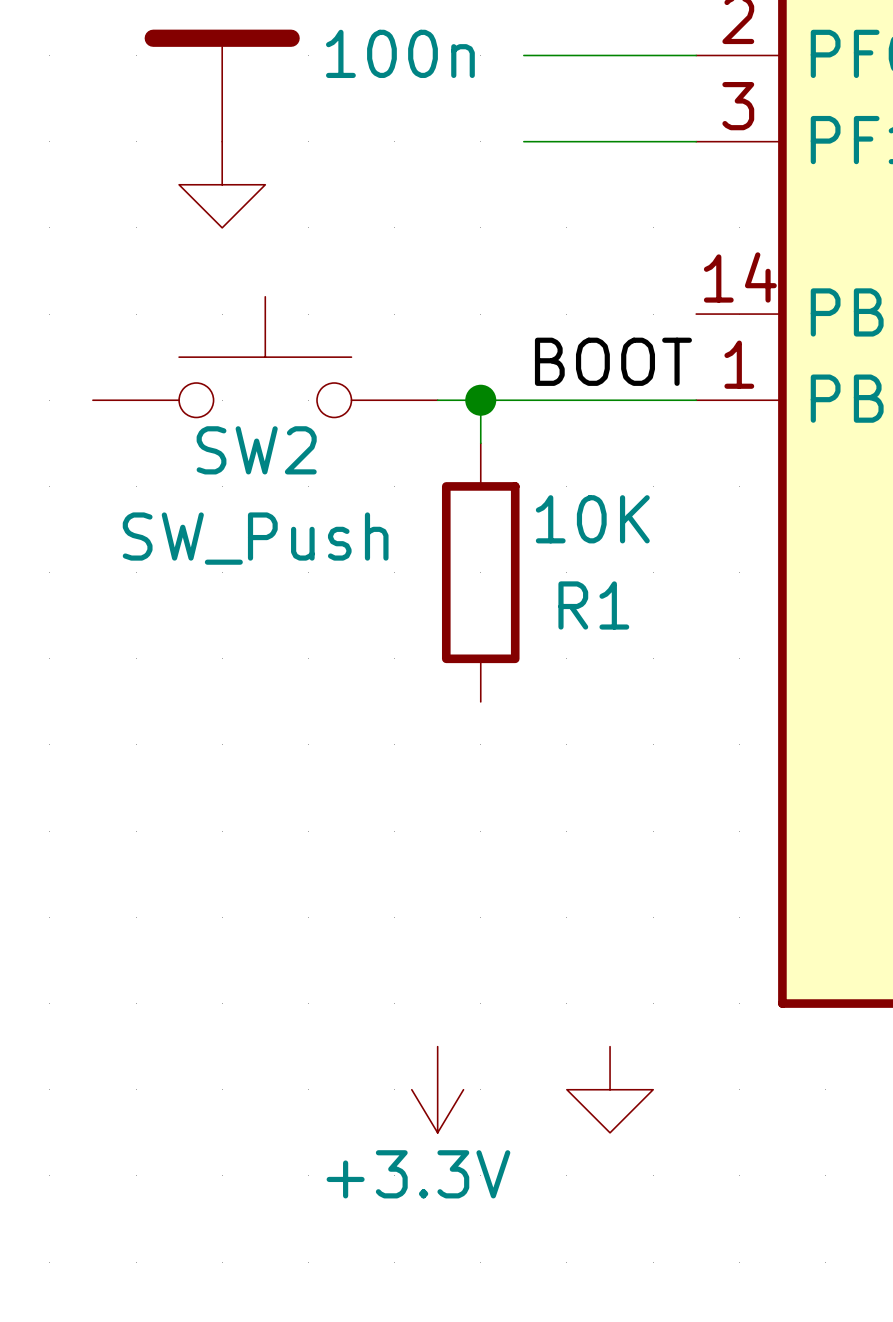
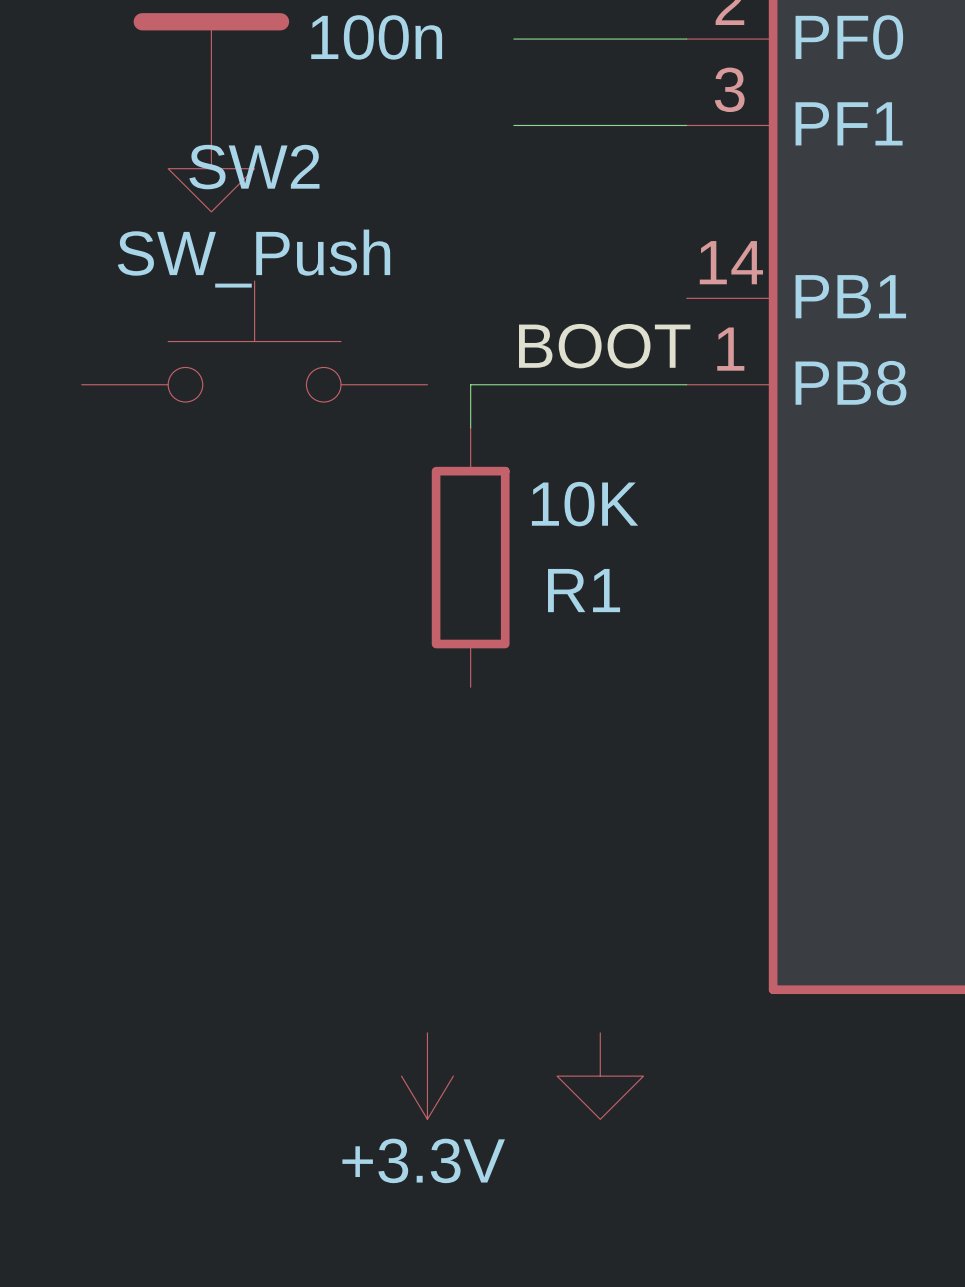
wire: (437, 400) (480, 400) -> none
junction: (480, 400) -> none
SW2 name position: SW2 (256, 450) -> SW2 (254, 167)
SW2 value position: SW_Push (255, 538) -> SW_Push (253, 258)

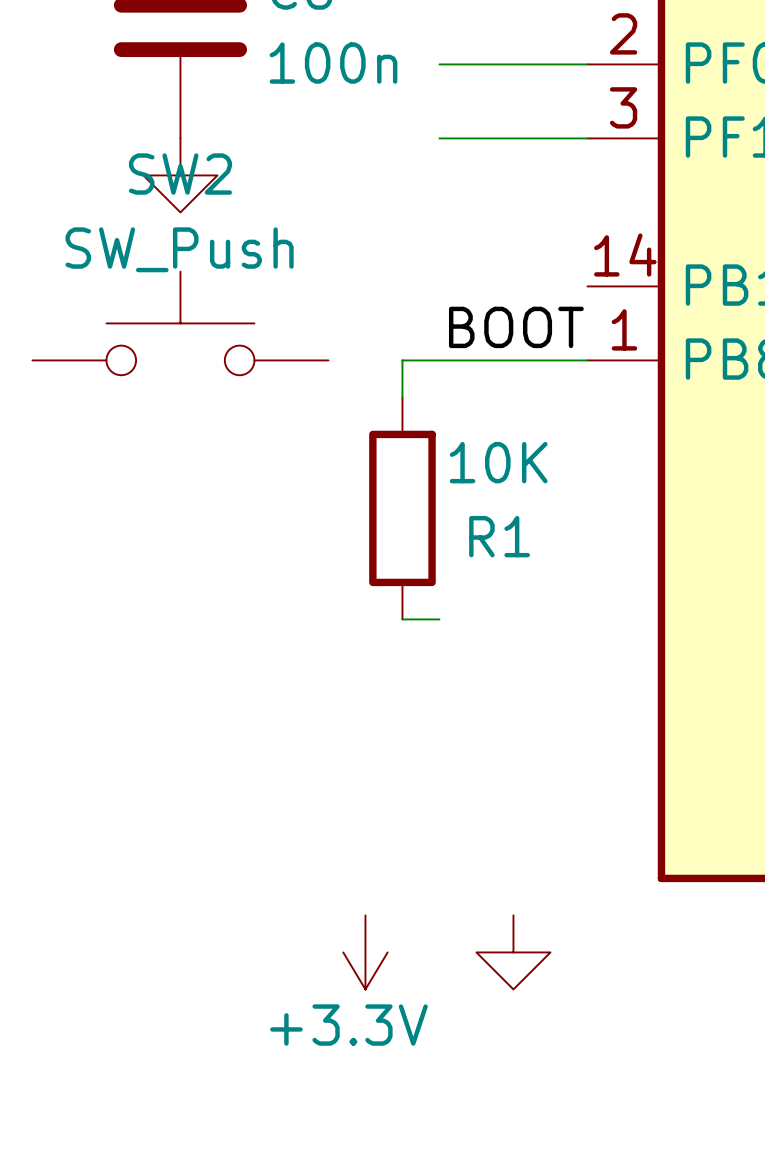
SW2 position: (254, 341) -> (180, 323)
wire: none -> (402, 619) (439, 619)

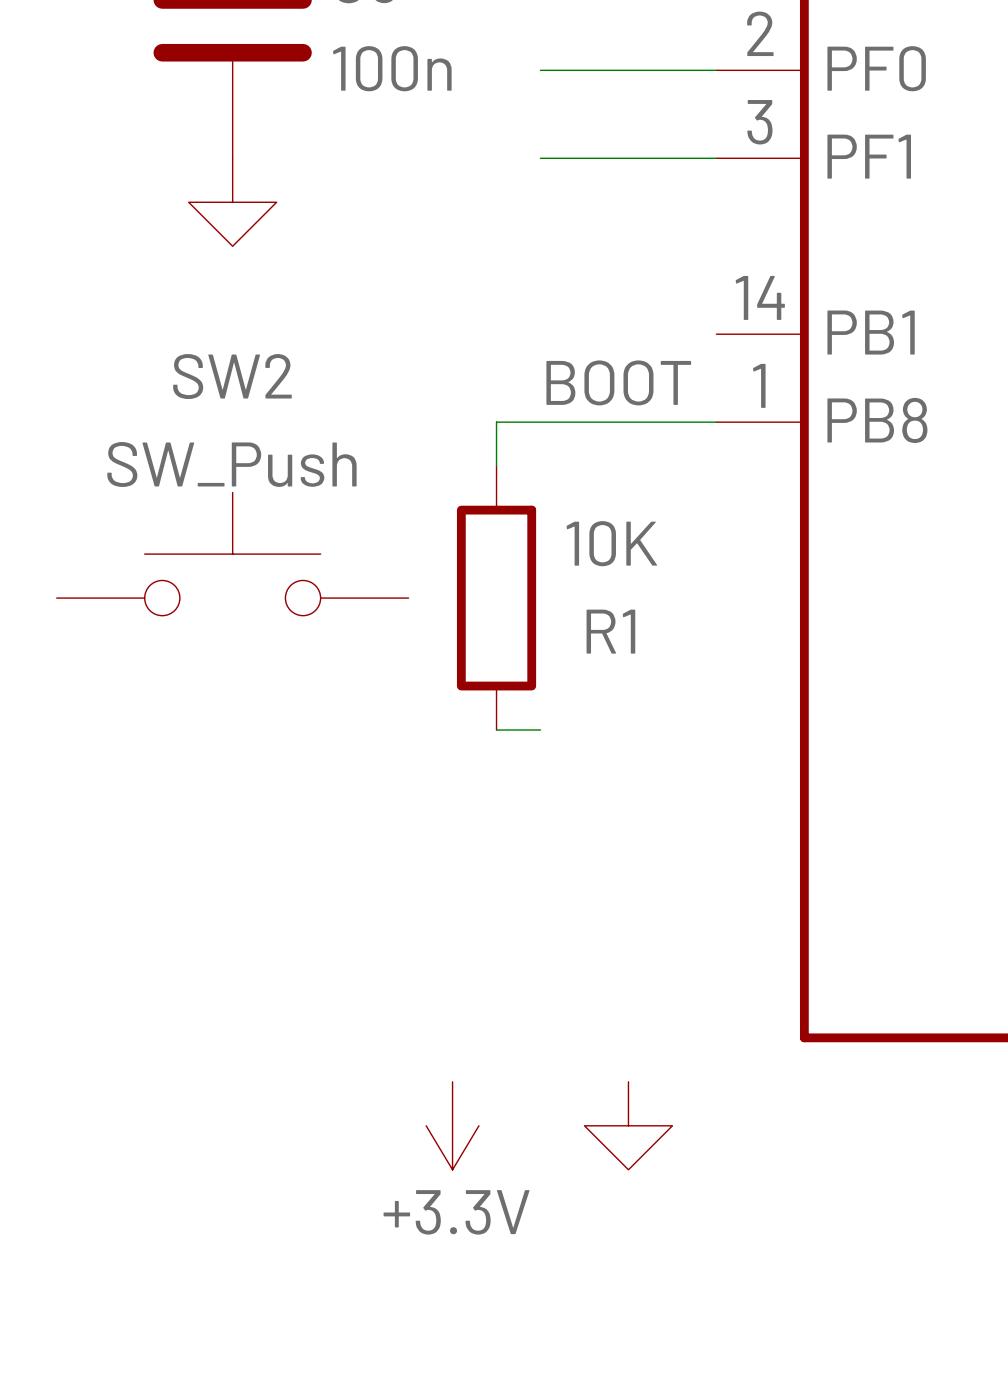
SW2 position: (180, 323) -> (232, 554)

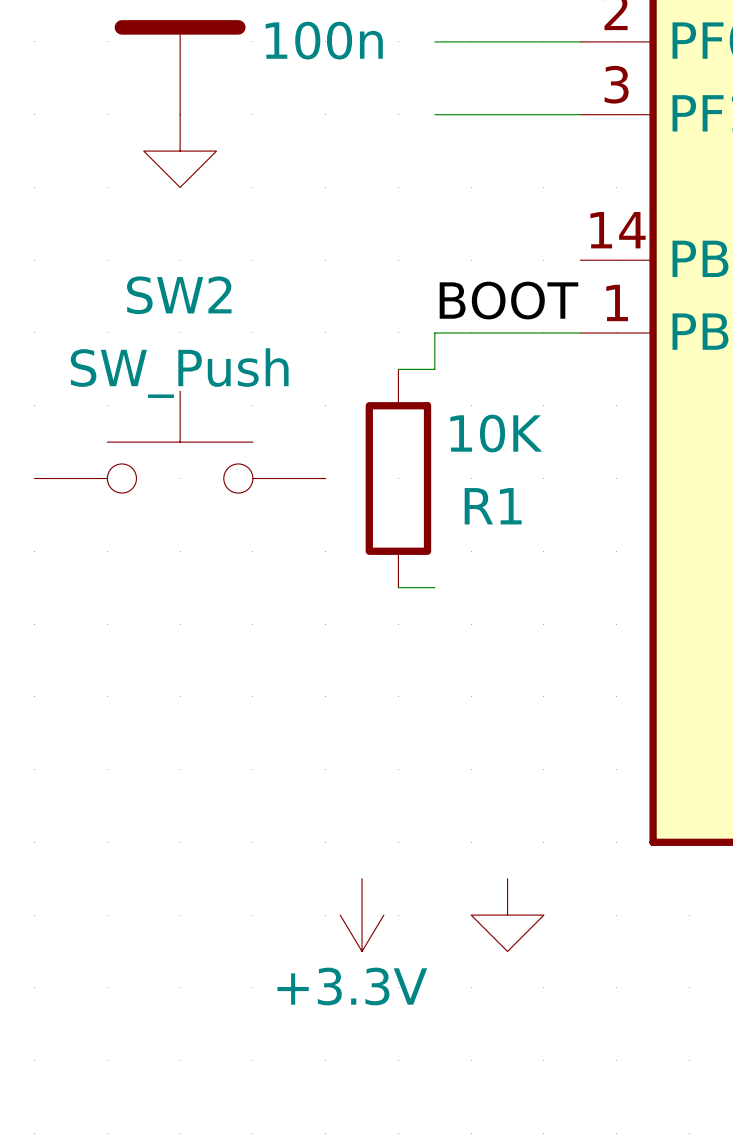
wire: (540, 422) (496, 422) (496, 466) -> (434, 332) (434, 369) (398, 369)

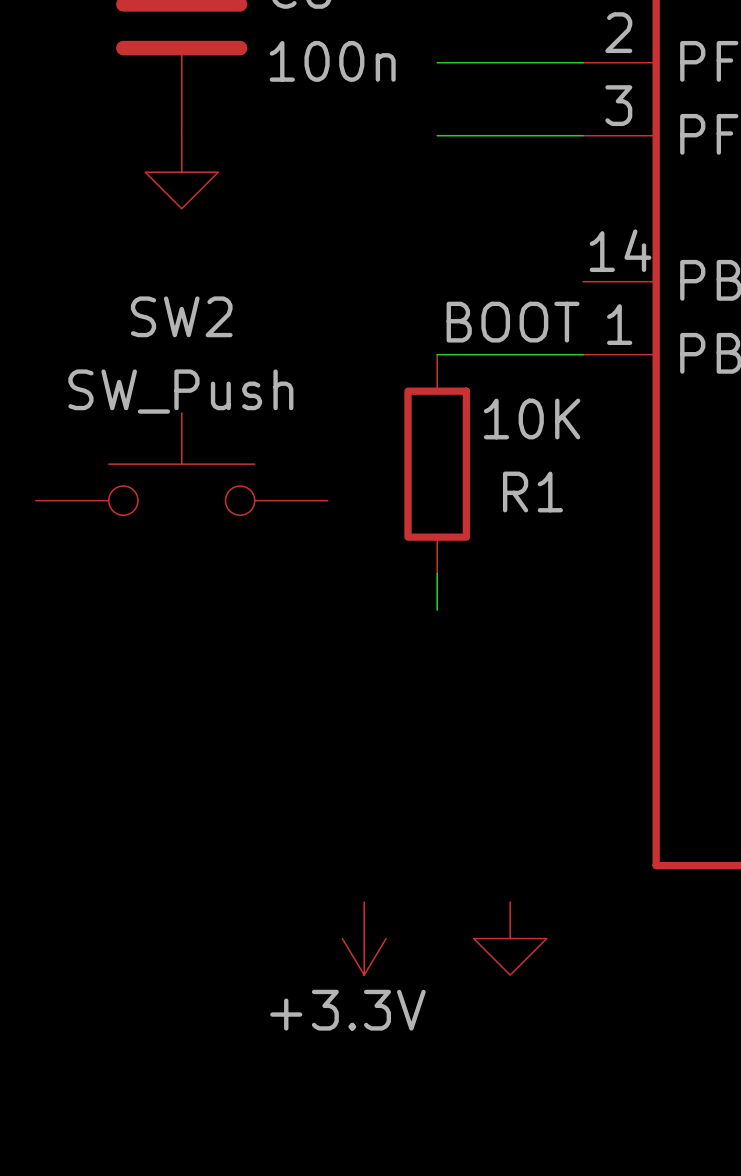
R1 position: (398, 478) -> (437, 464)
wire: (398, 587) (434, 587) -> (437, 573) (437, 610)

